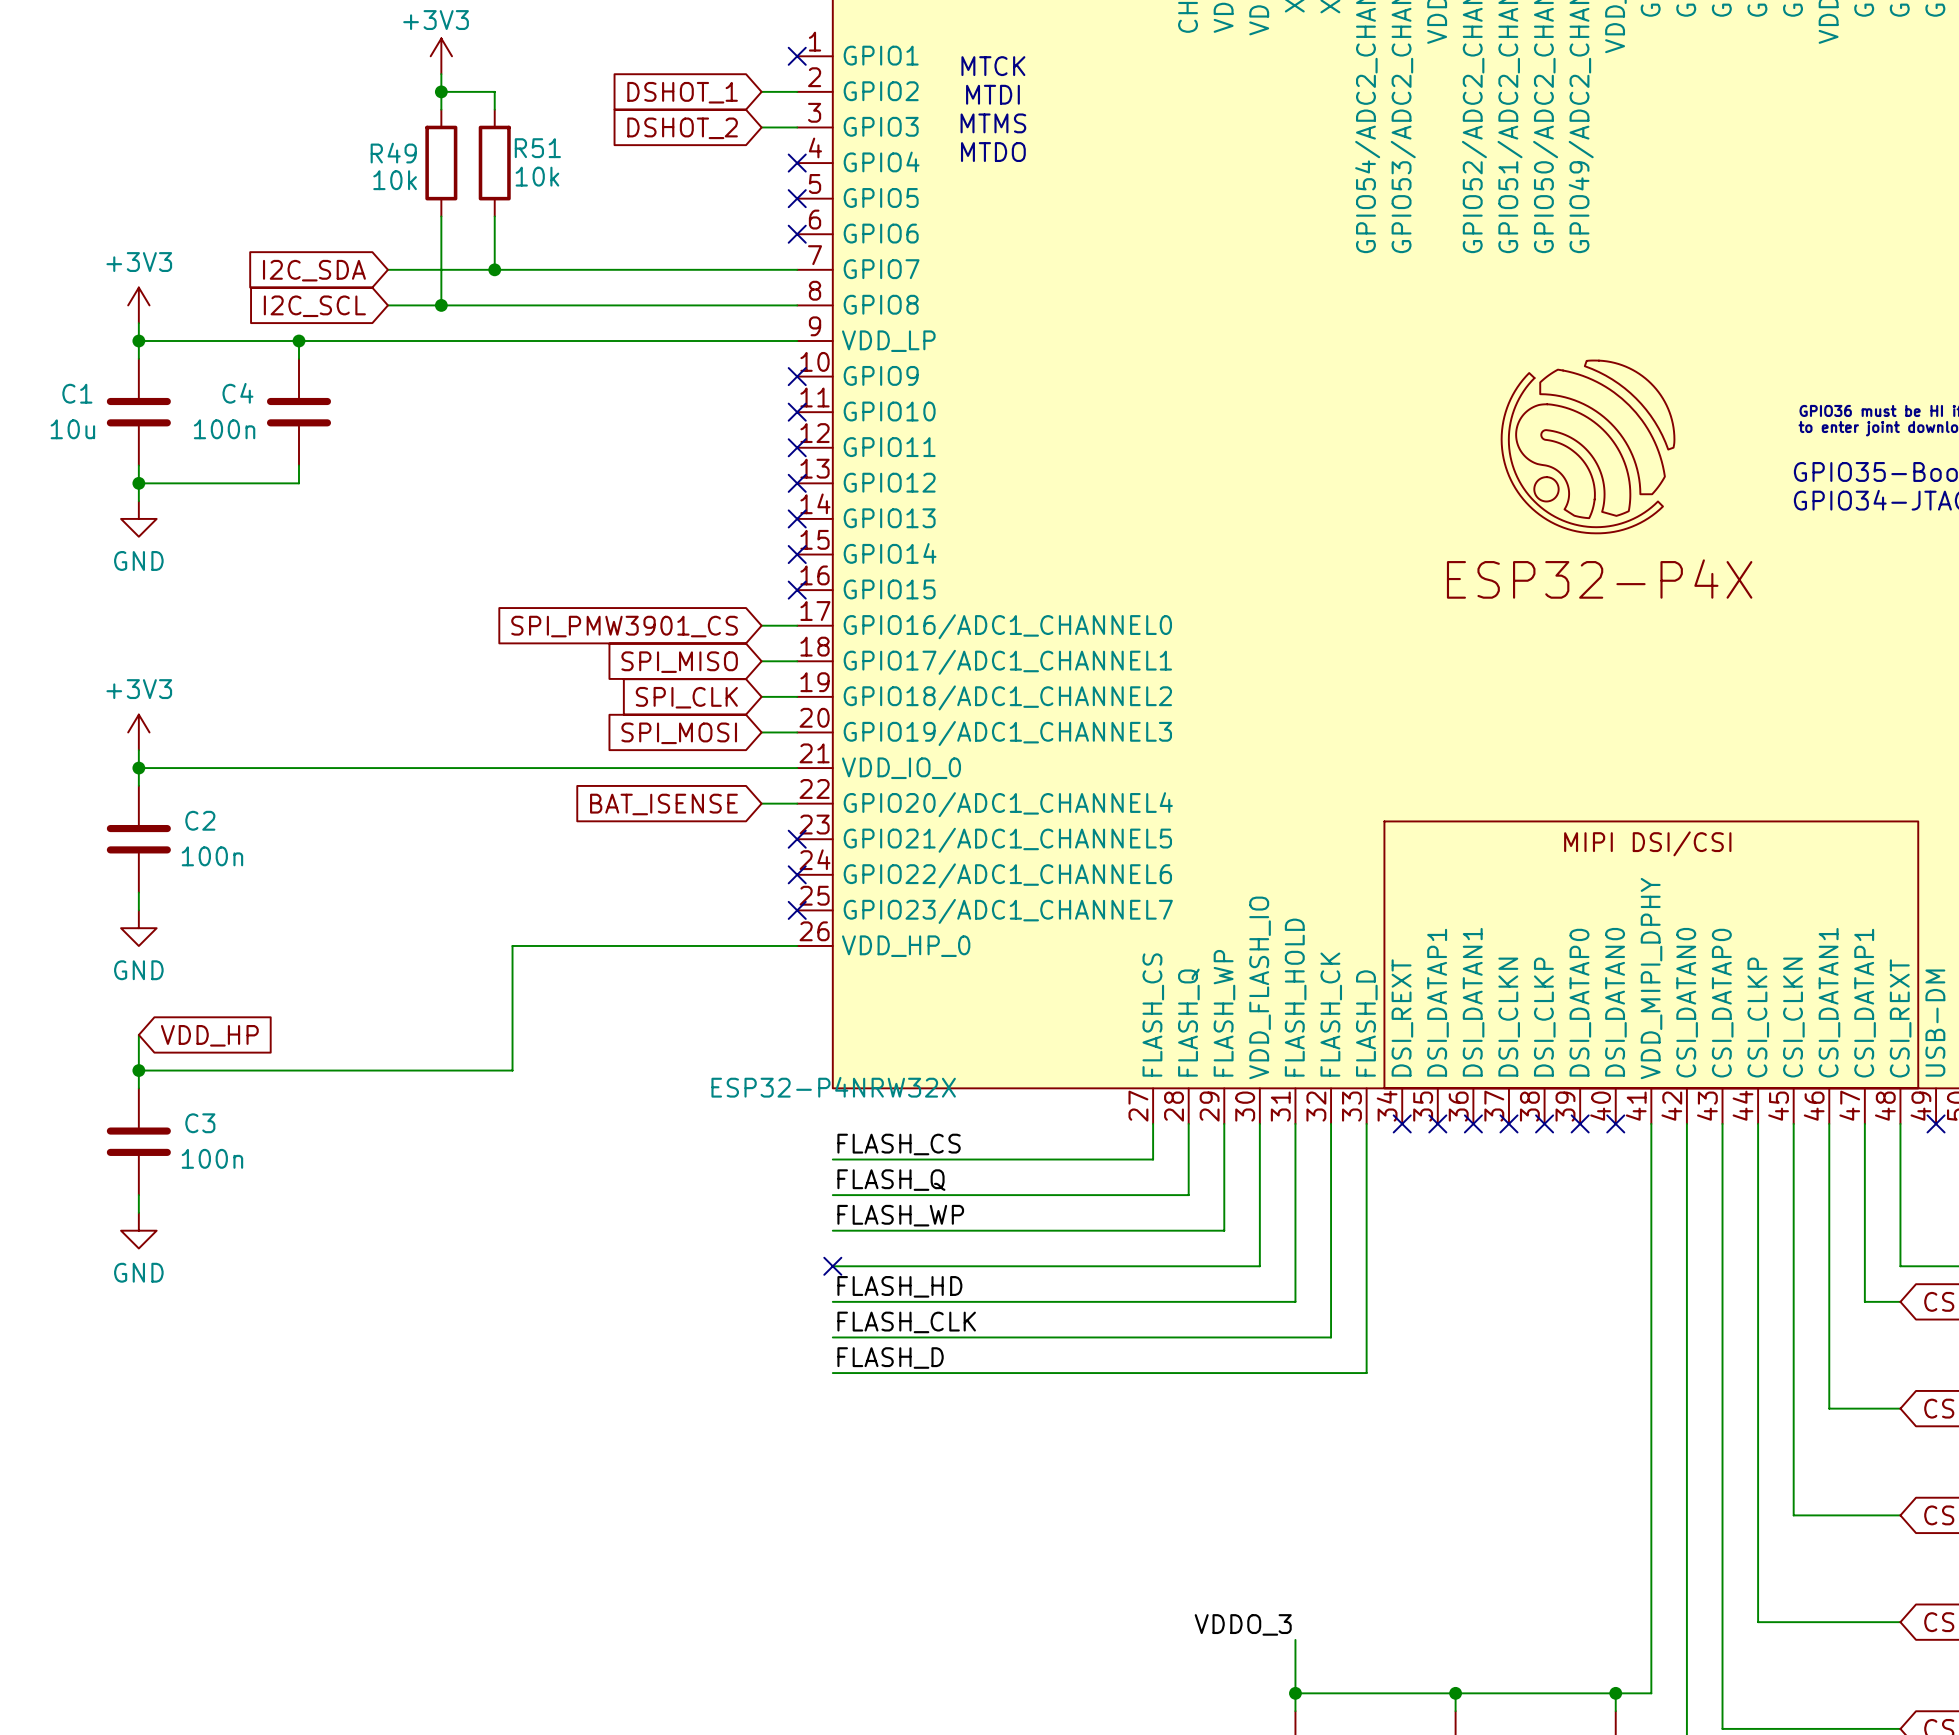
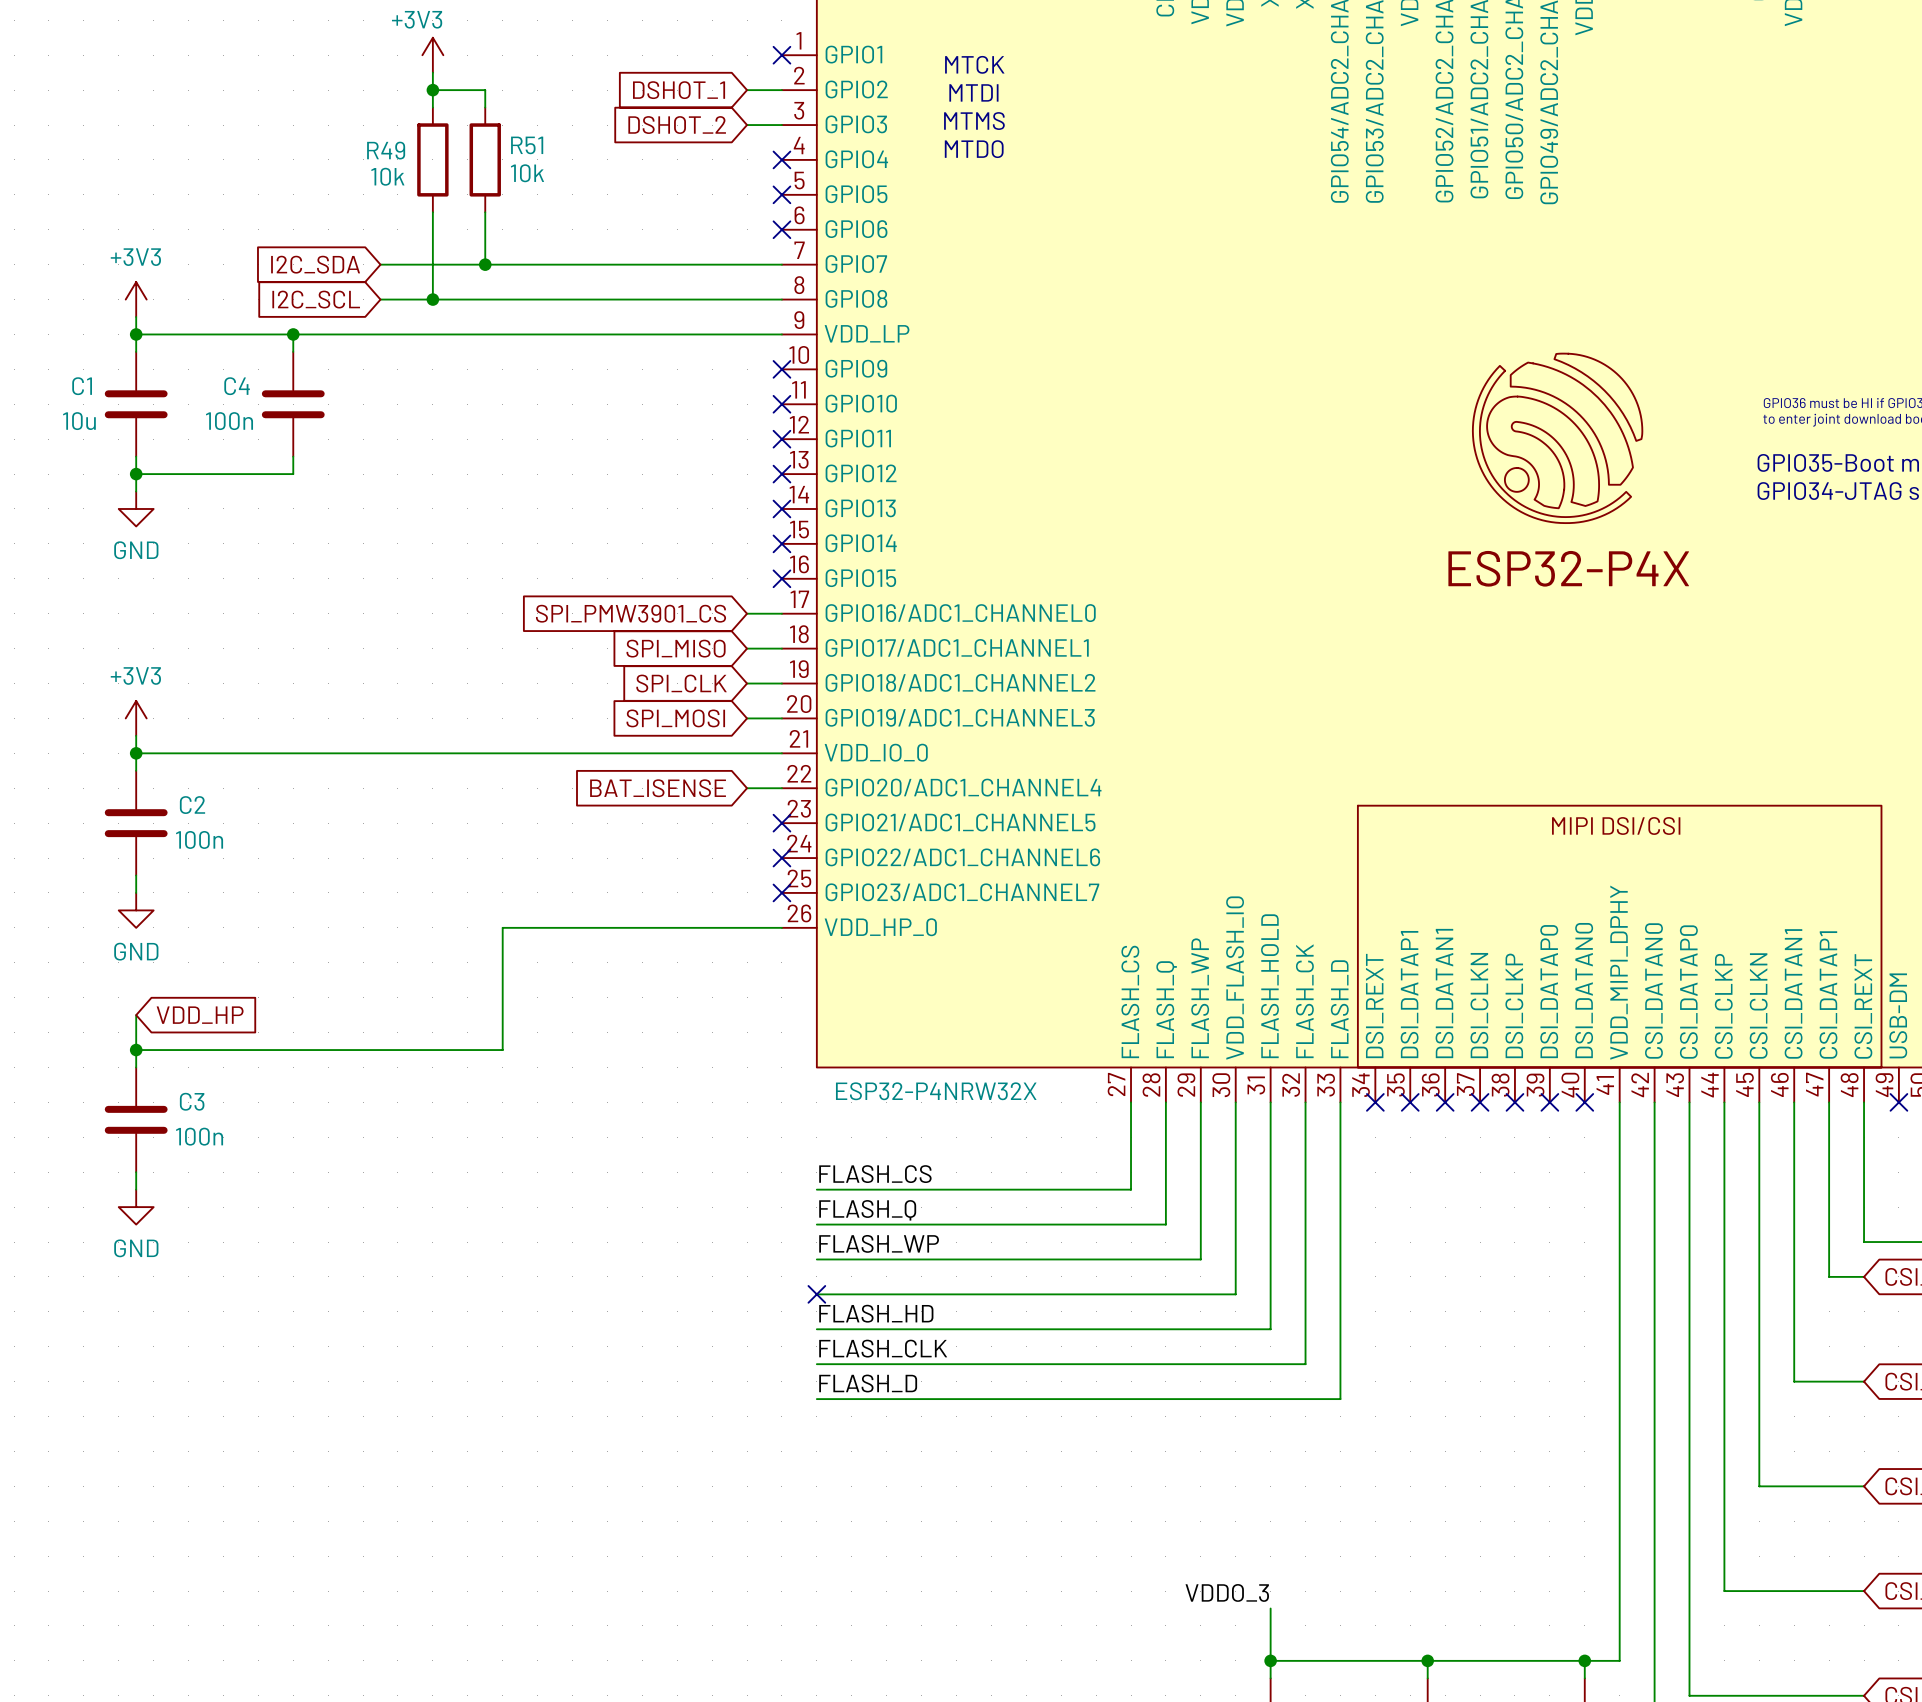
part value position: ESP32-P4NRW32X (833, 1087) -> ESP32-P4NRW32X (936, 1091)
label position: FLASH_CS (899, 1144) -> FLASH_CS (875, 1174)
wire: (832, 1159) (1153, 1159) -> (816, 1189) (1131, 1189) (1131, 1137)
label position: FLASH_Q (891, 1180) -> FLASH_Q (867, 1210)
wire: (832, 1195) (1188, 1195) -> (816, 1224) (1165, 1224) (1165, 1172)
label position: FLASH_WP (900, 1215) -> FLASH_WP (879, 1243)
wire: (832, 1230) (1224, 1230) -> (816, 1259) (1200, 1259) (1200, 1207)
wire: (832, 1266) (1259, 1266) -> (816, 1294) (1235, 1294) (1235, 1242)
no-connect mark position: (832, 1266) -> (816, 1294)
label position: FLASH_HD (899, 1286) -> FLASH_HD (876, 1313)
wire: (832, 1301) (1295, 1301) -> (816, 1329) (1270, 1329) (1270, 1276)
label position: FLASH_CLK (906, 1322) -> FLASH_CLK (883, 1348)
wire: (832, 1337) (1331, 1337) -> (816, 1364) (1305, 1364) (1305, 1311)
label position: FLASH_D (890, 1358) -> FLASH_D (868, 1383)
wire: (832, 1373) (1366, 1373) -> (816, 1399) (1340, 1399) (1340, 1346)

